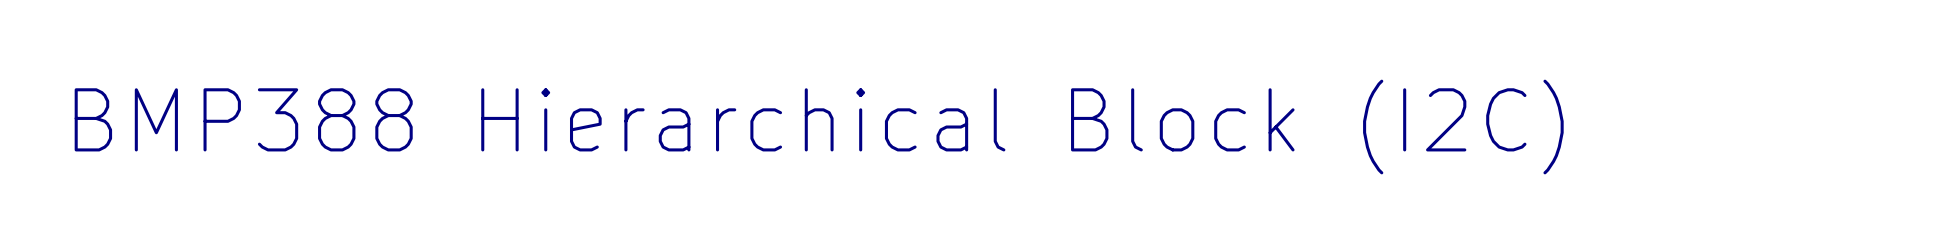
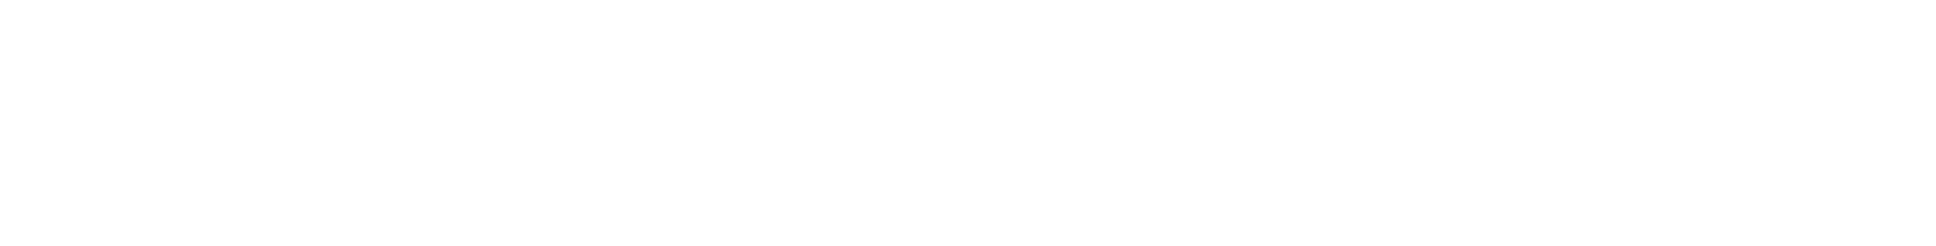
text: BMP388 Hierarchical Block (I2C) (819, 127) -> none

